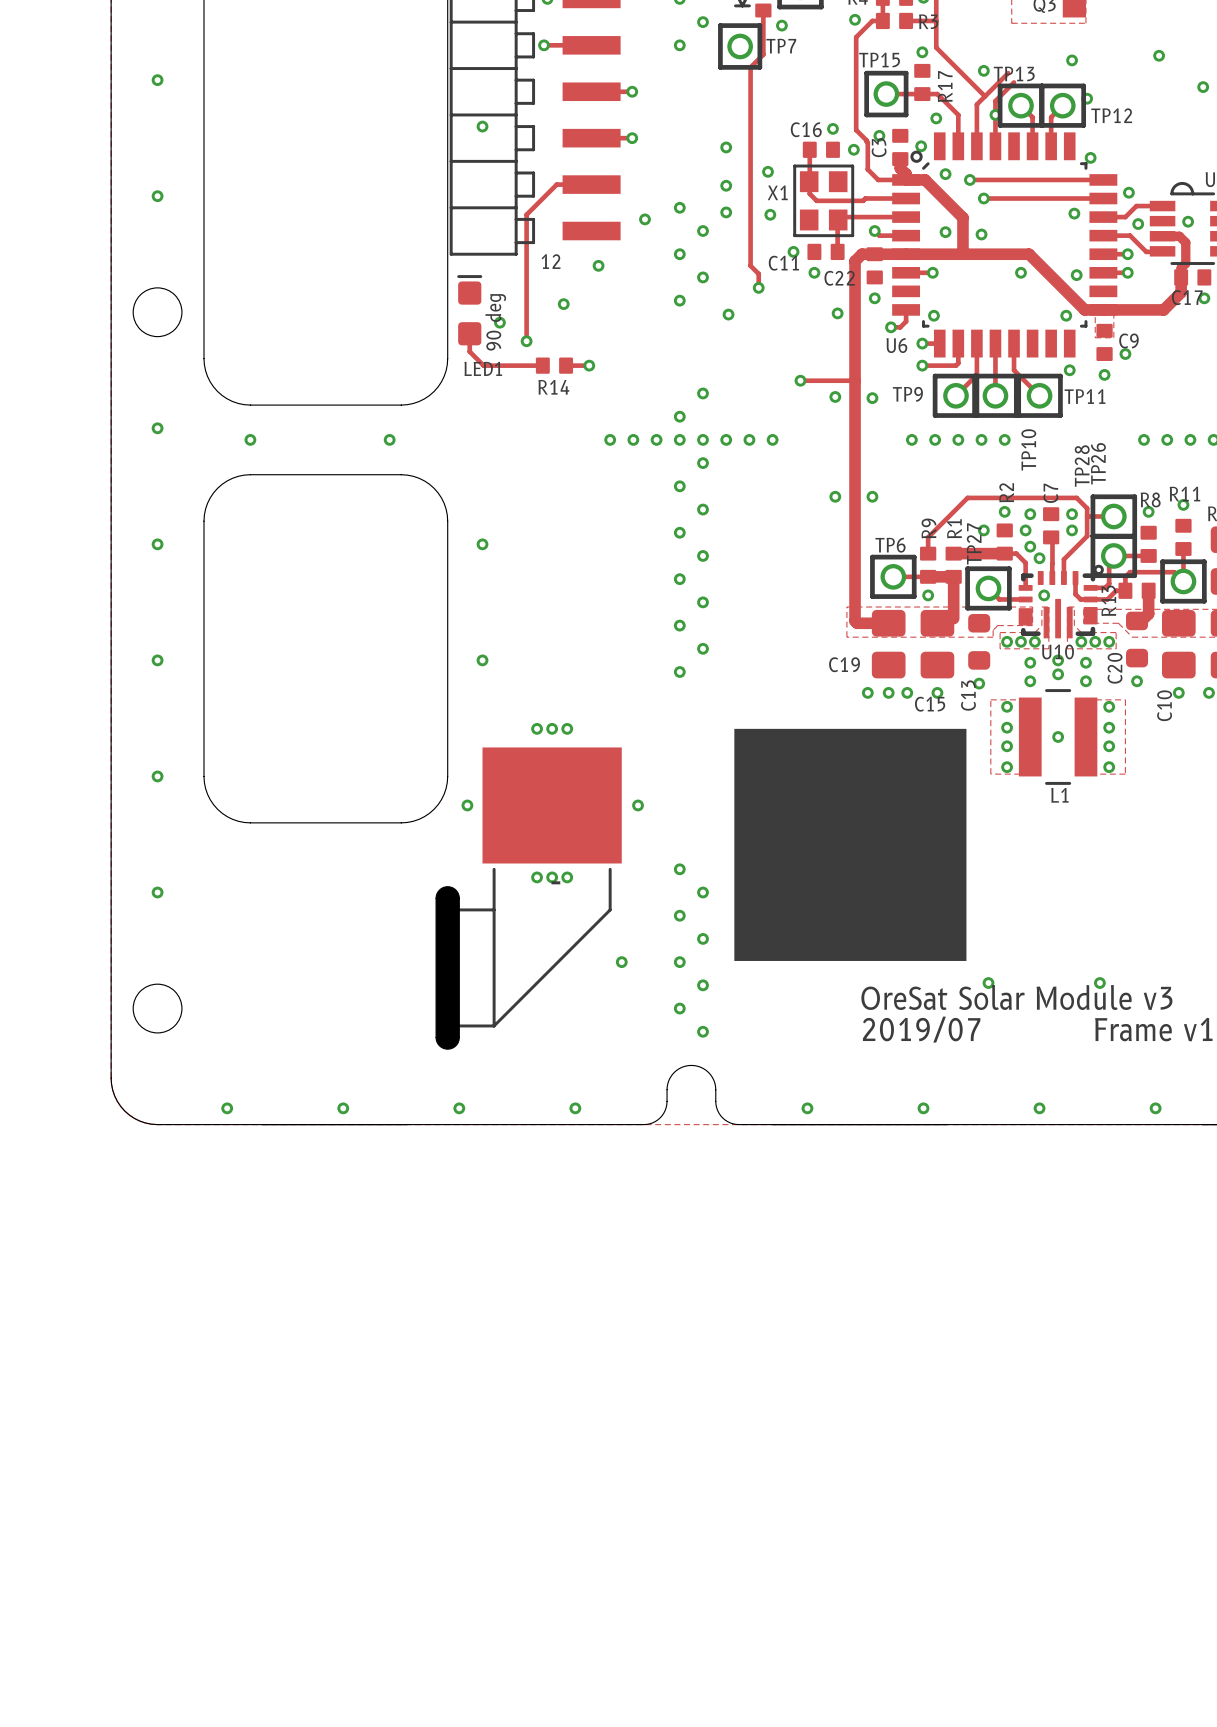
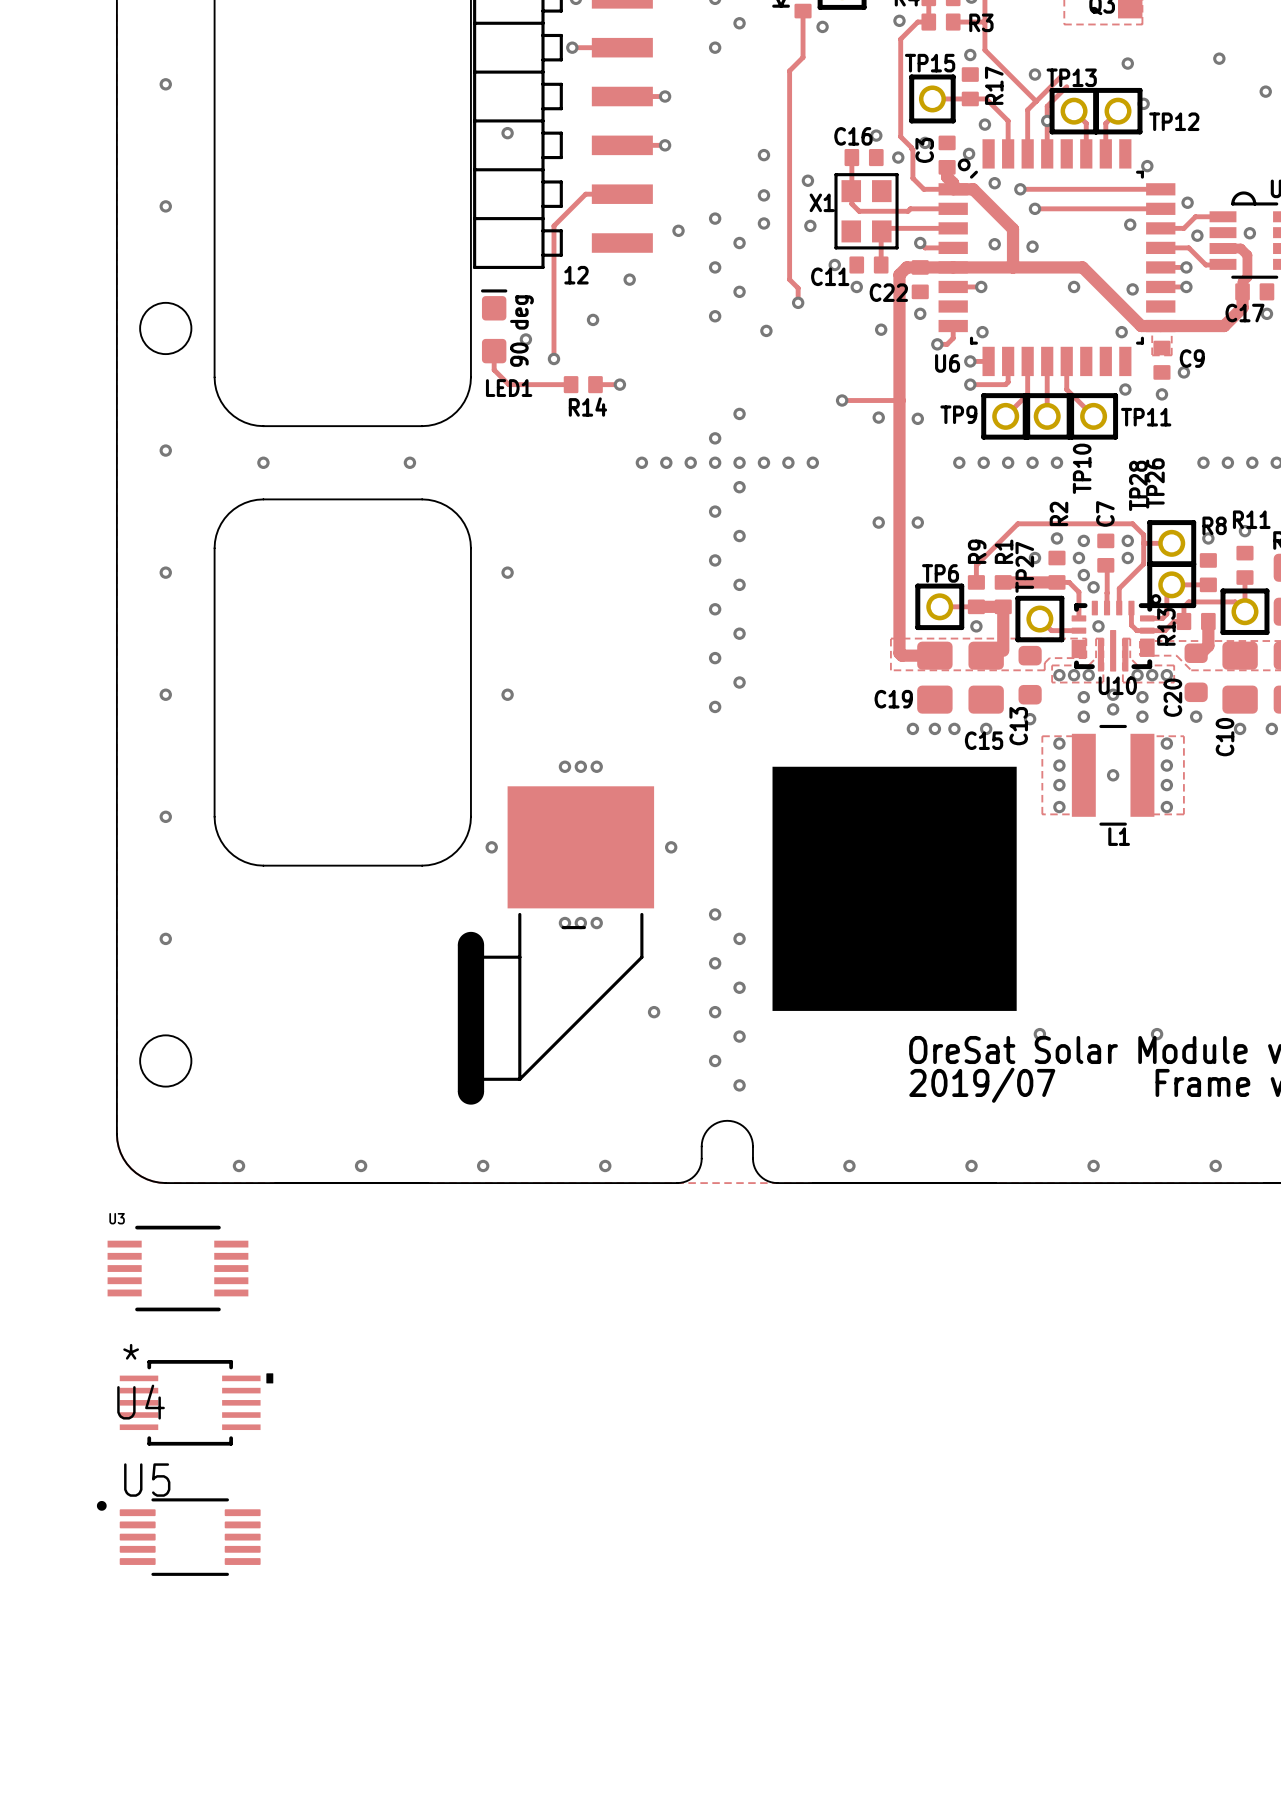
TP7: (740, 46) -> none
U3: none -> (177, 1268)
U4: none -> (196, 1402)
U5: none -> (178, 1537)

